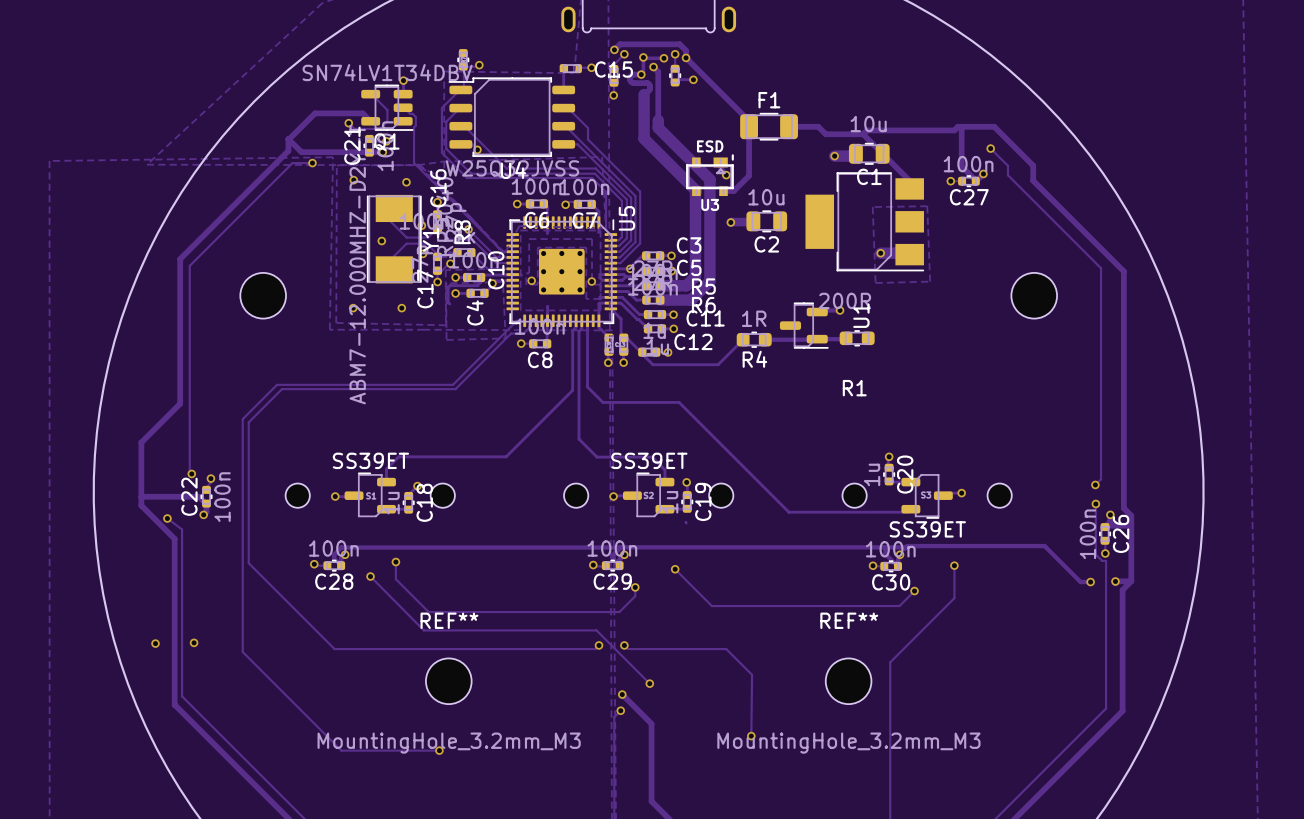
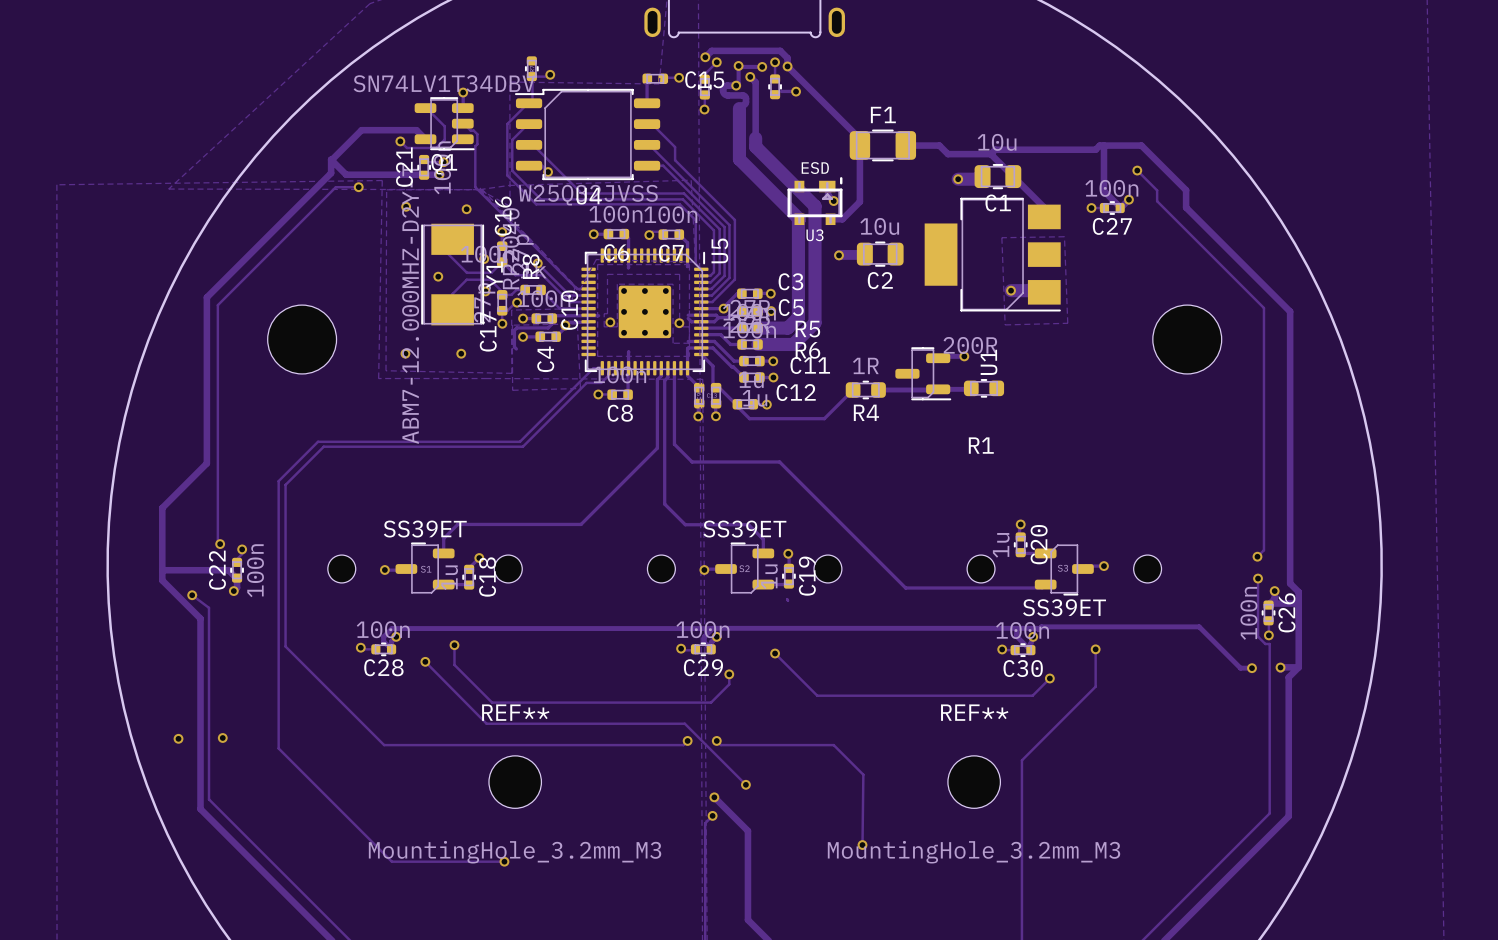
part footprint: [240, 272, 287, 319] -> [267, 305, 337, 374]
part footprint: [1011, 272, 1058, 319] -> [1152, 305, 1222, 374]

